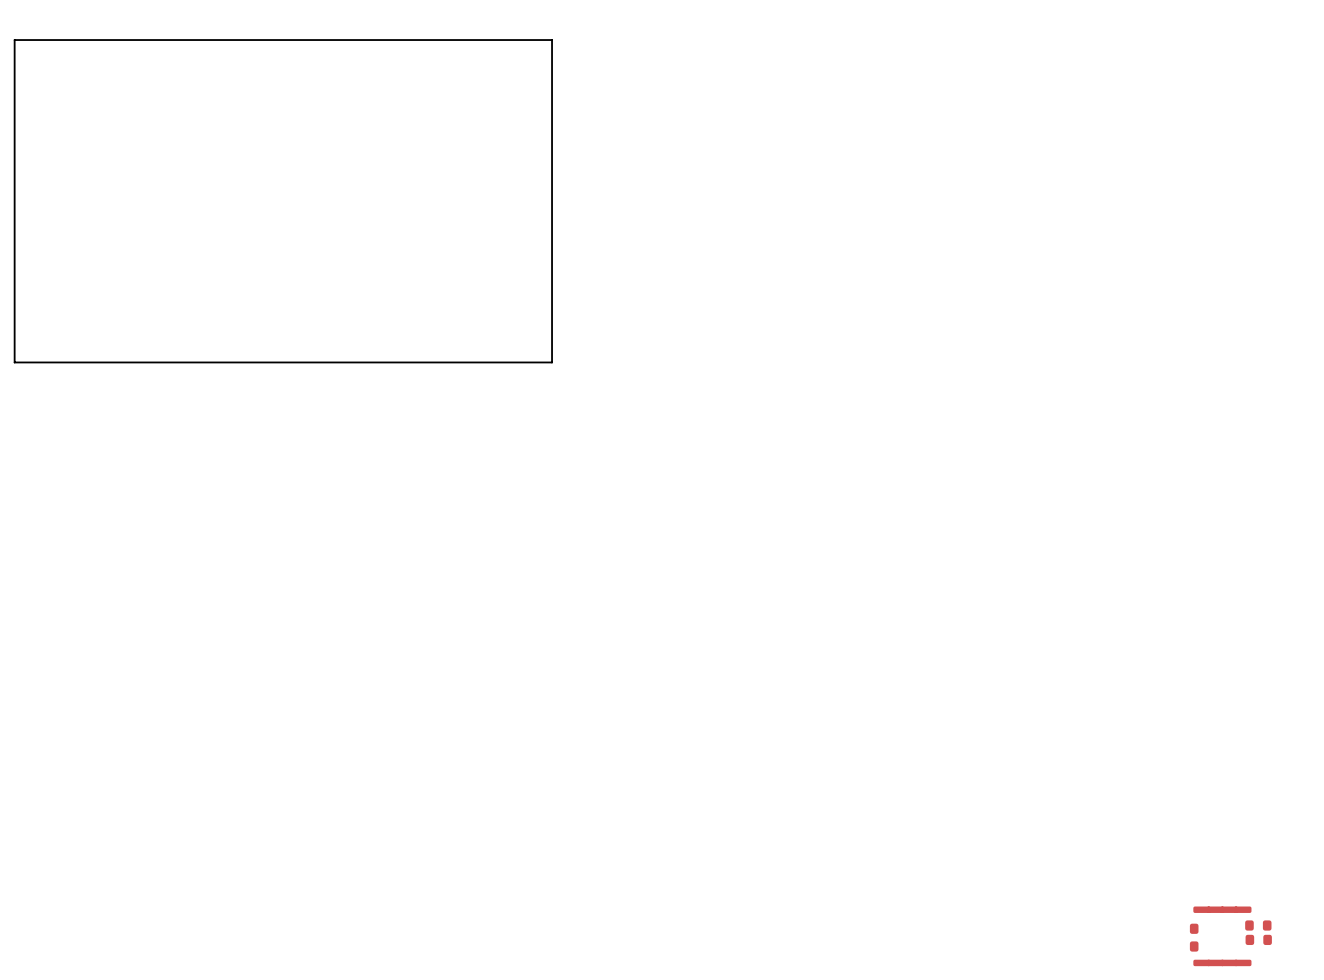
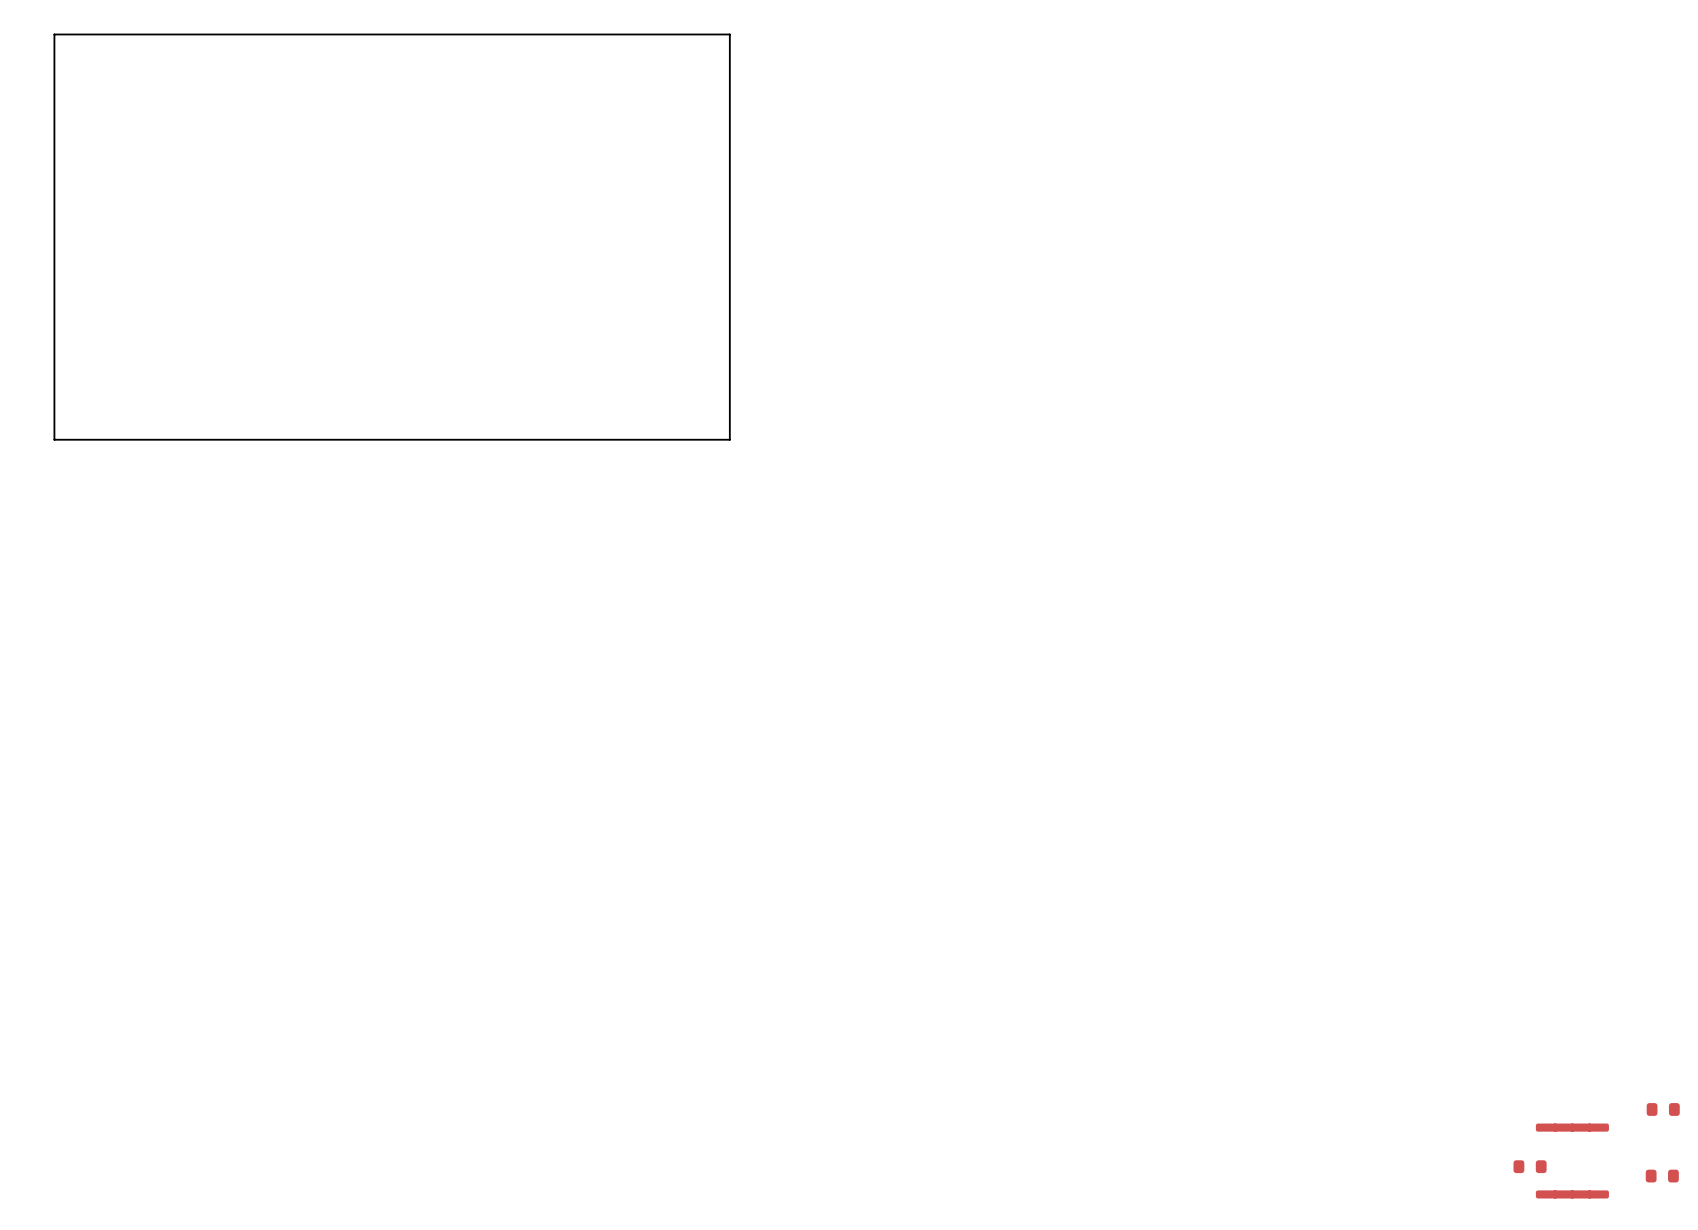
part: none -> (1663, 1109)
part footprint: [1189, 923, 1199, 952] -> [1513, 1160, 1547, 1174]
part: (1258, 925) -> none
part: (1258, 939) -> none
part: none -> (1662, 1176)

